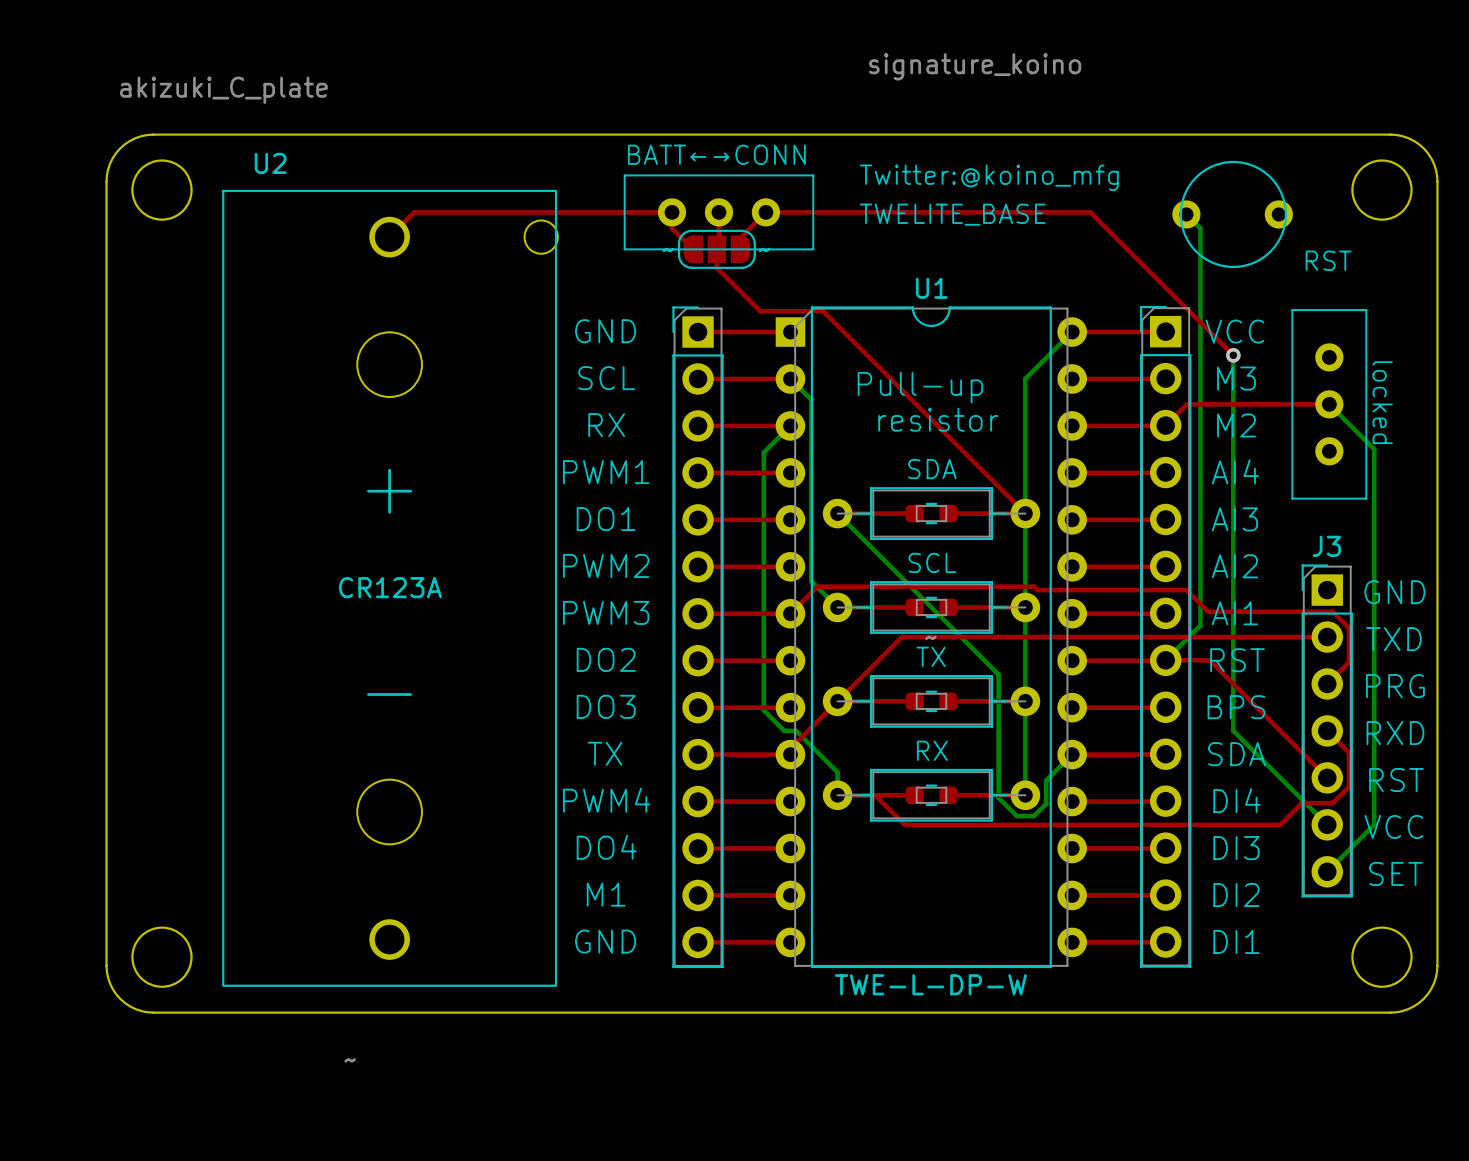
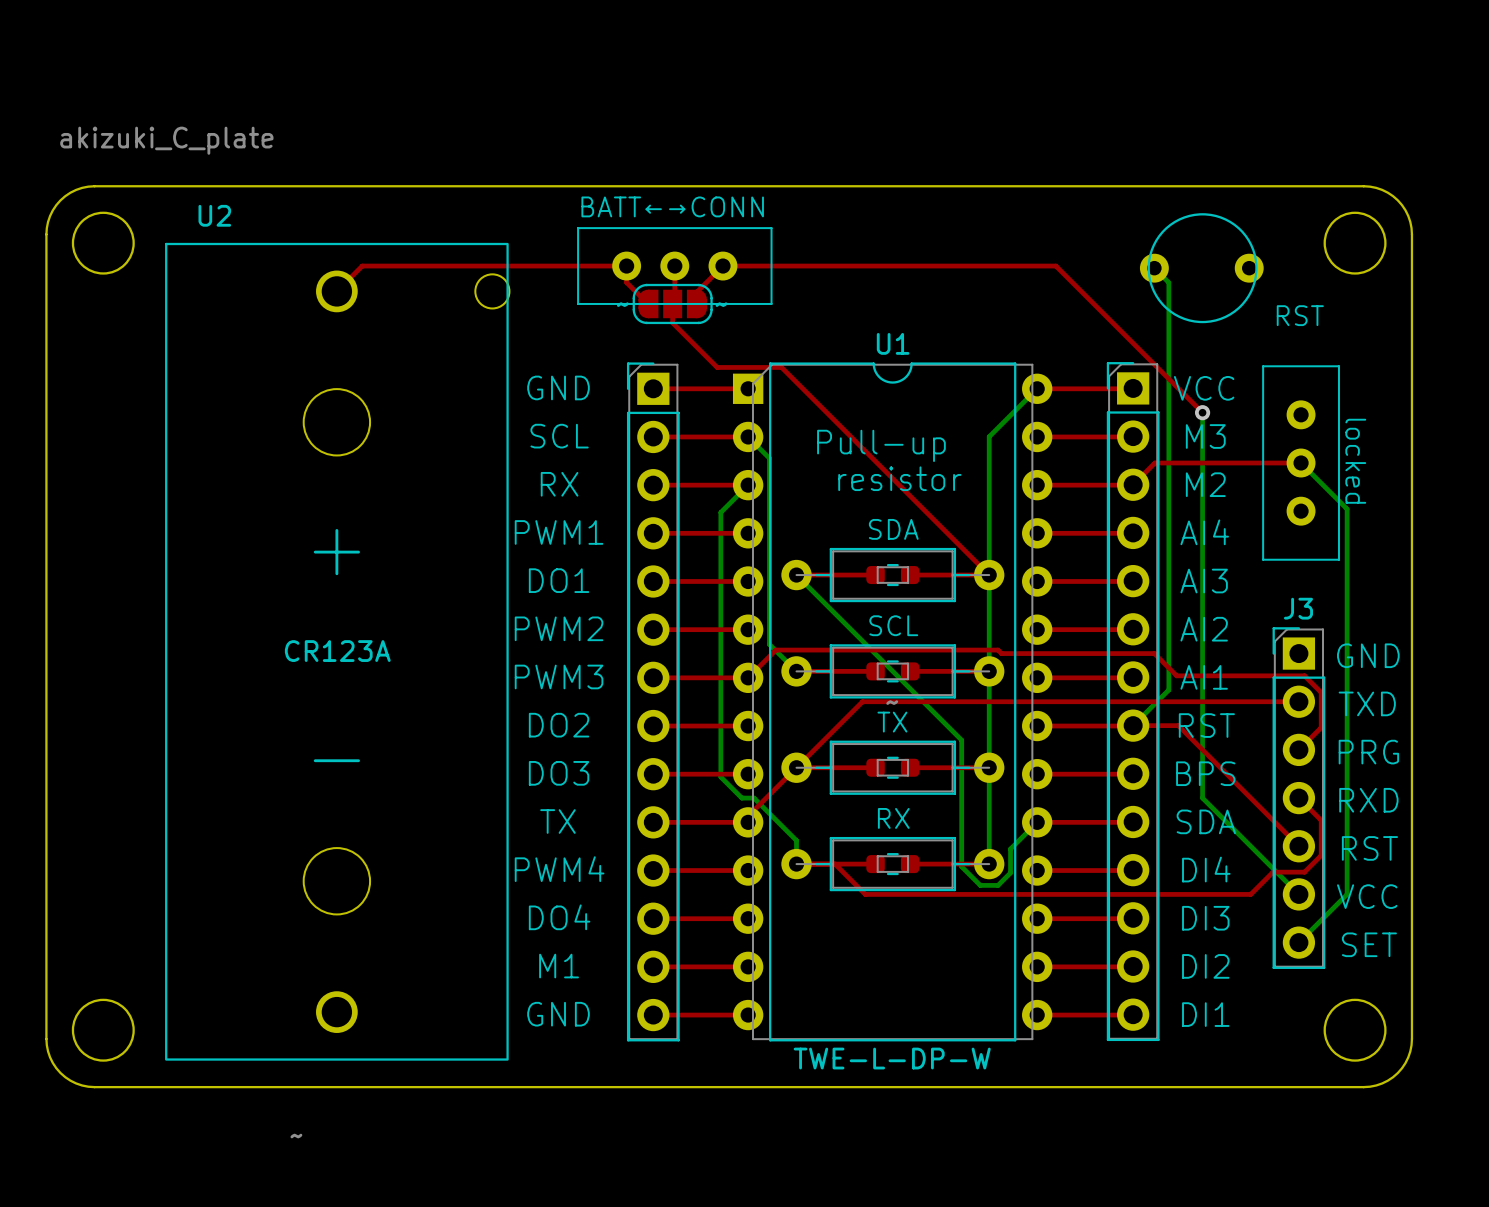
drawing: [859, 53, 1119, 192] -> none
text: TWELITE_BASE (952, 214) -> none

